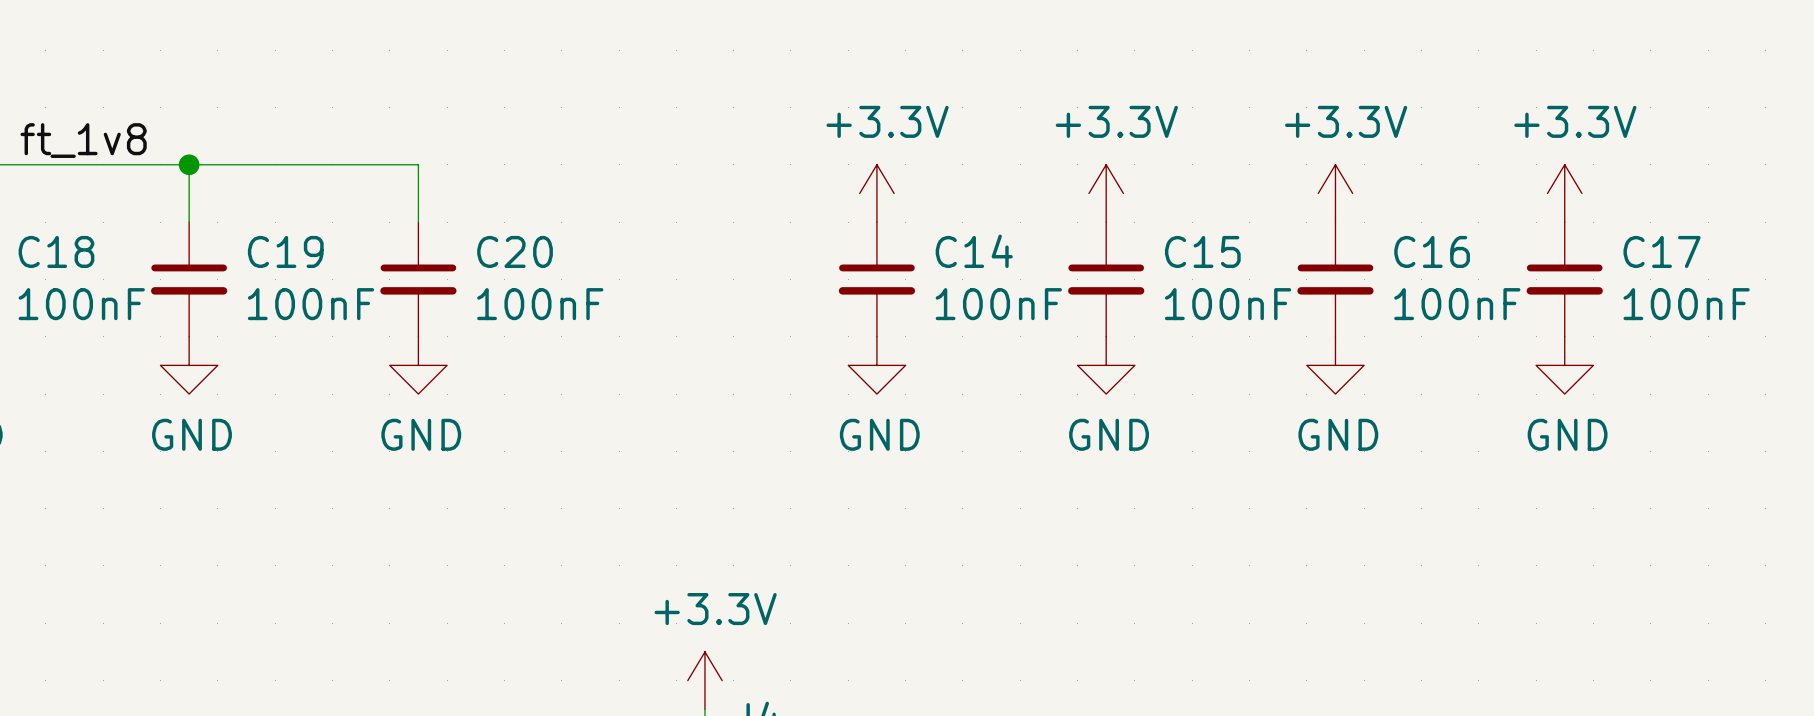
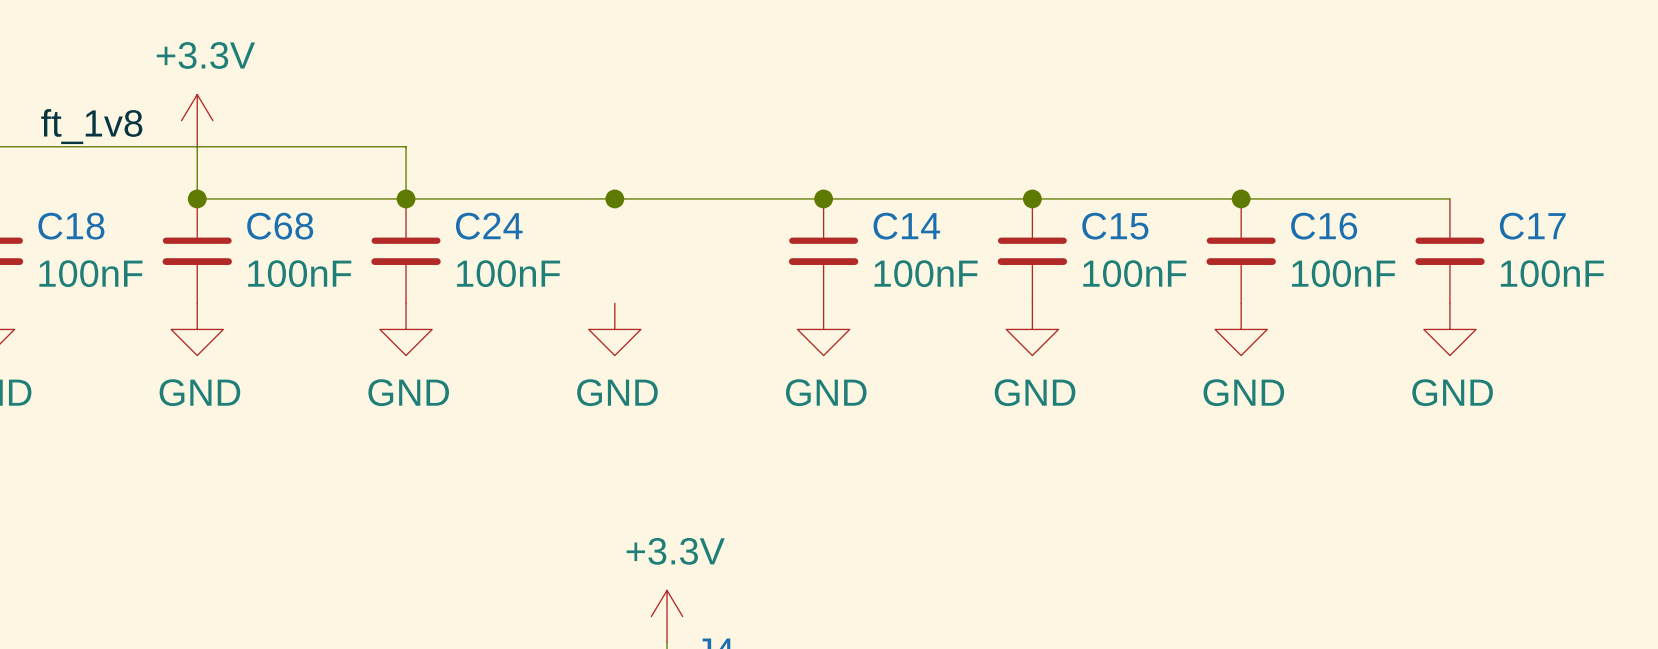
power symbol: none -> +3.3V (197, 120)
junction position: (189, 164) -> (197, 198)
power symbol: +3.3V (876, 193) -> none
power symbol: +3.3V (1106, 193) -> none
power symbol: +3.3V (1335, 193) -> none
power symbol: +3.3V (1564, 193) -> none
wire: none -> (197, 198) (1449, 198)
junction: none -> (406, 198)
junction: none -> (614, 198)
junction: none -> (823, 198)
junction: none -> (1032, 198)
junction: none -> (1241, 198)
C19 name: C19 (285, 251) -> C68 (280, 226)
C20 name: C20 (515, 251) -> C24 (489, 226)
power symbol: none -> GND (614, 329)

